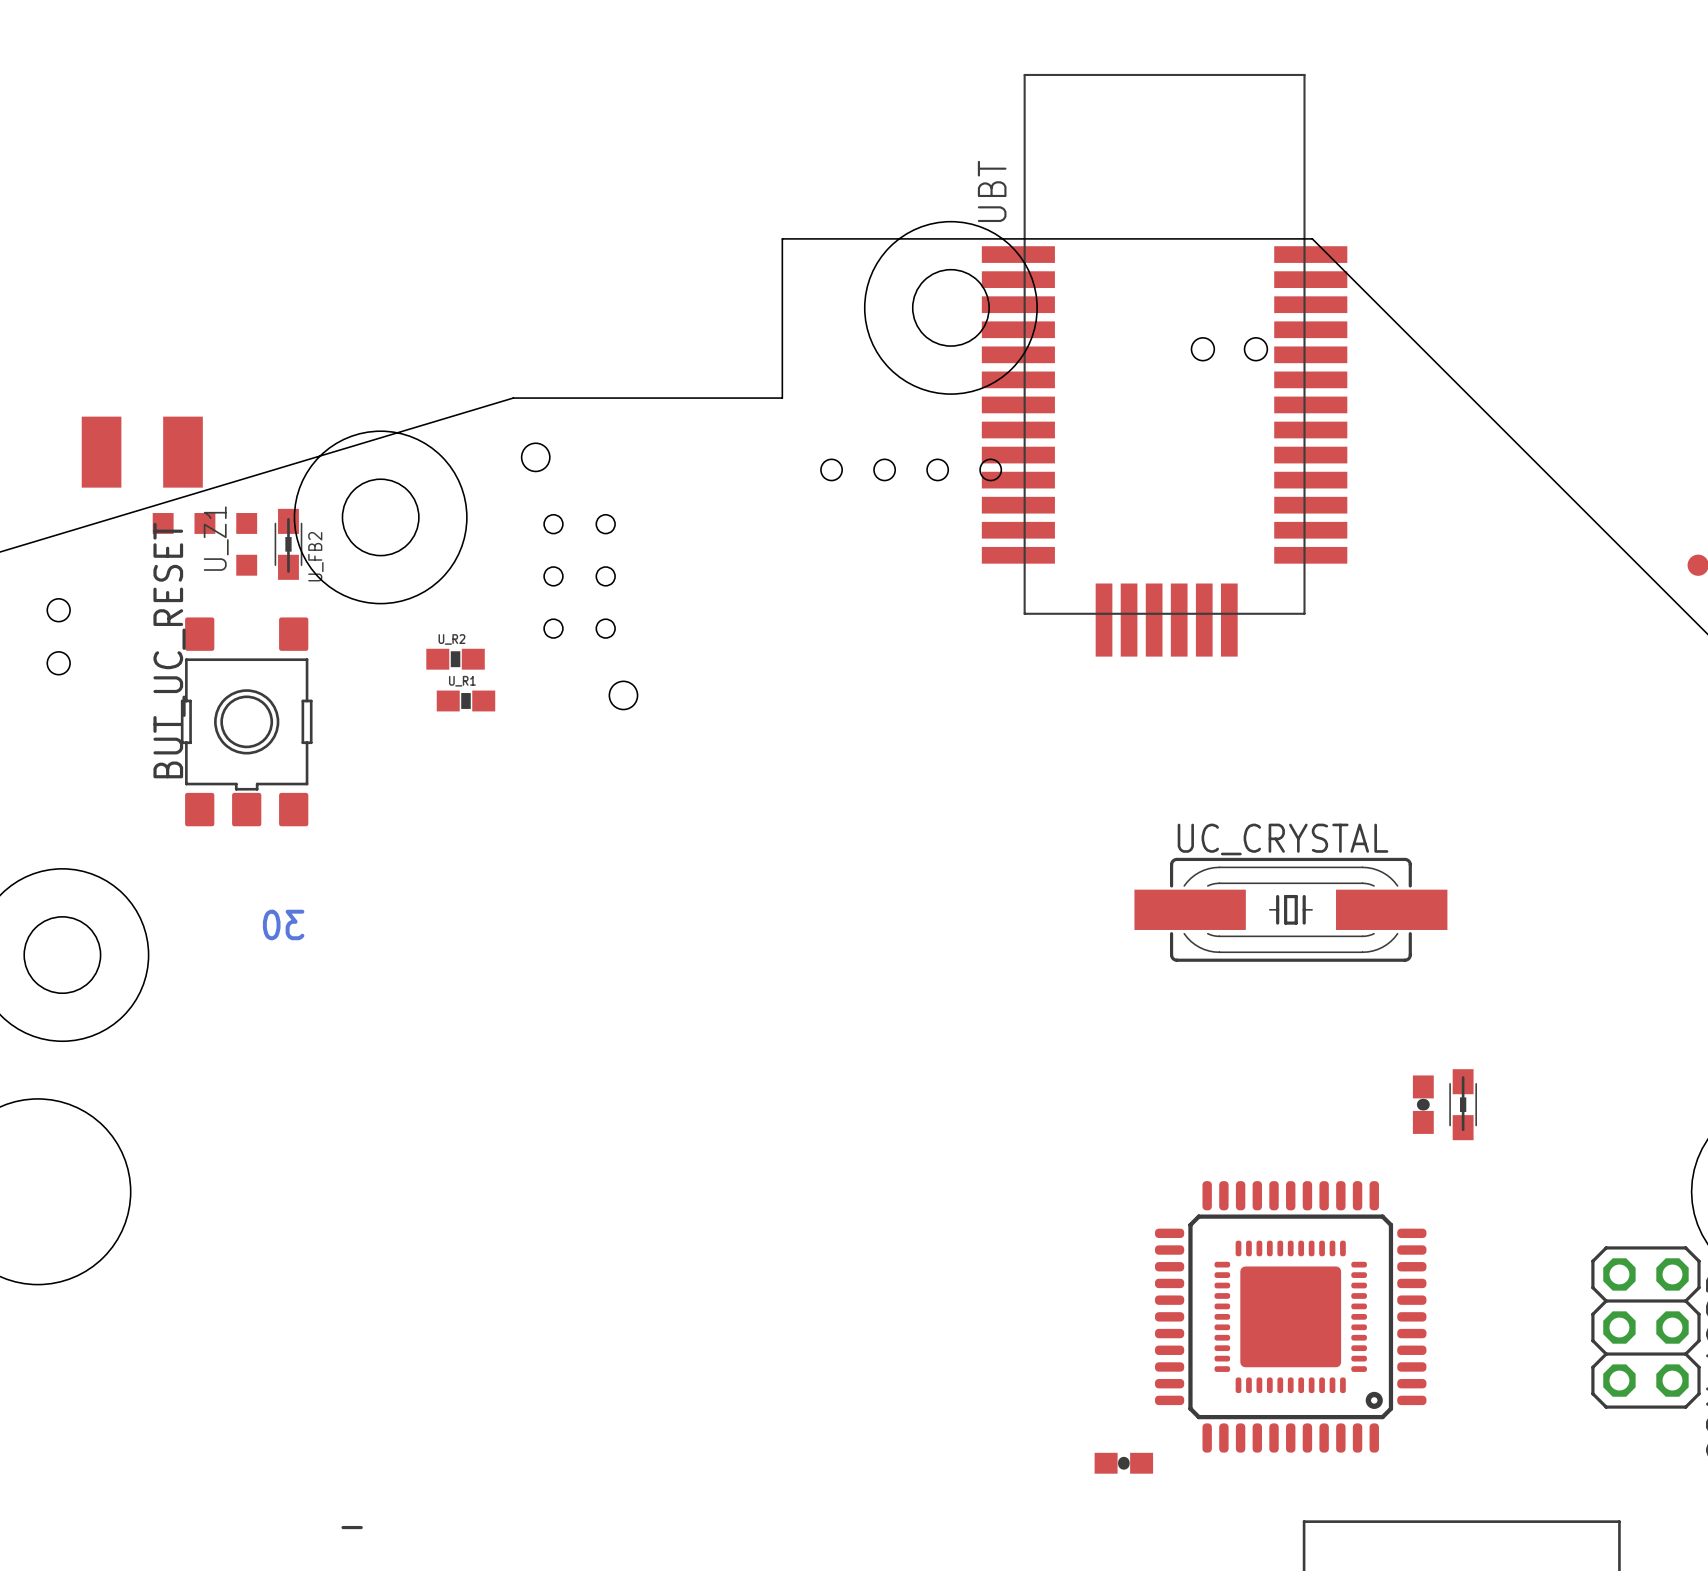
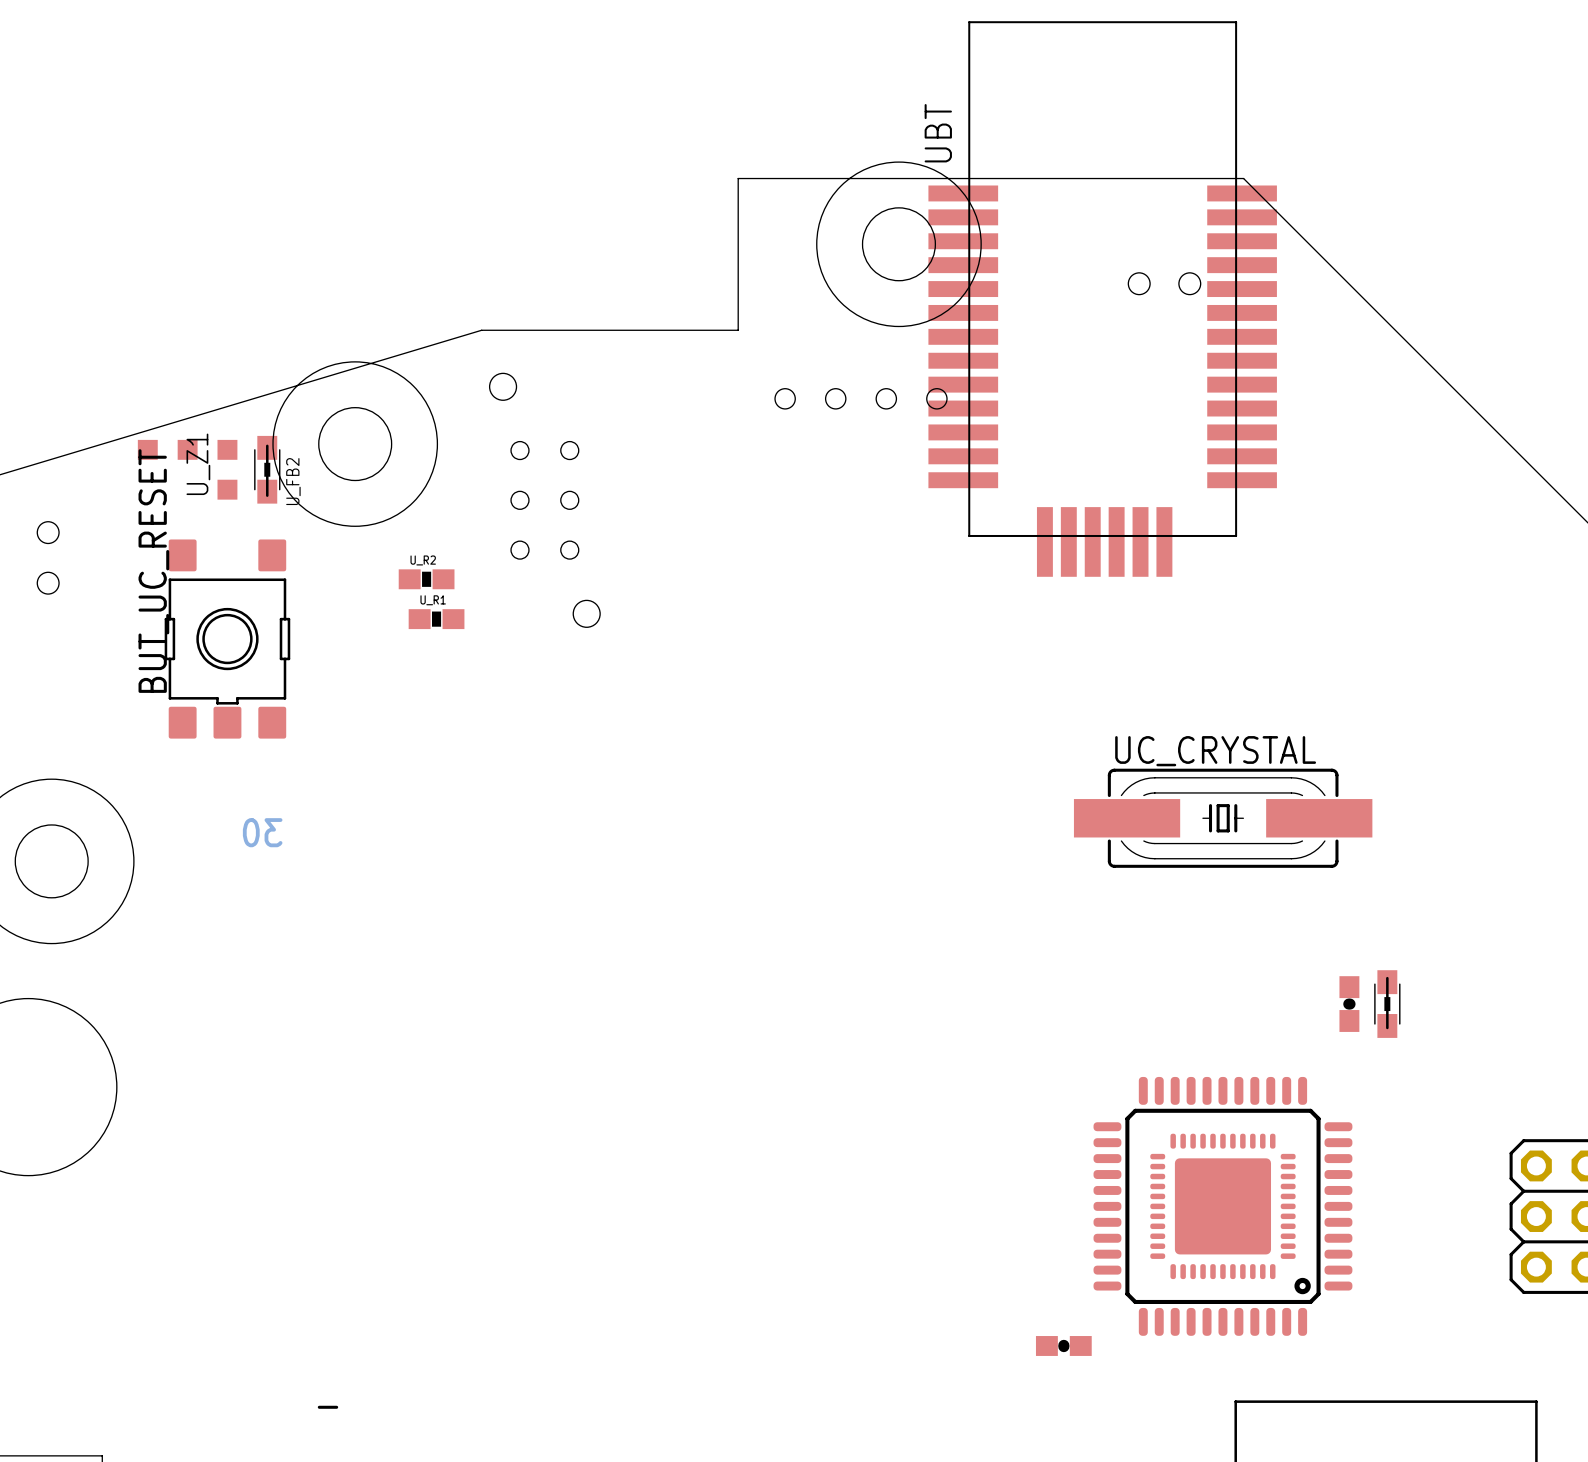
part: (142, 452) -> none

